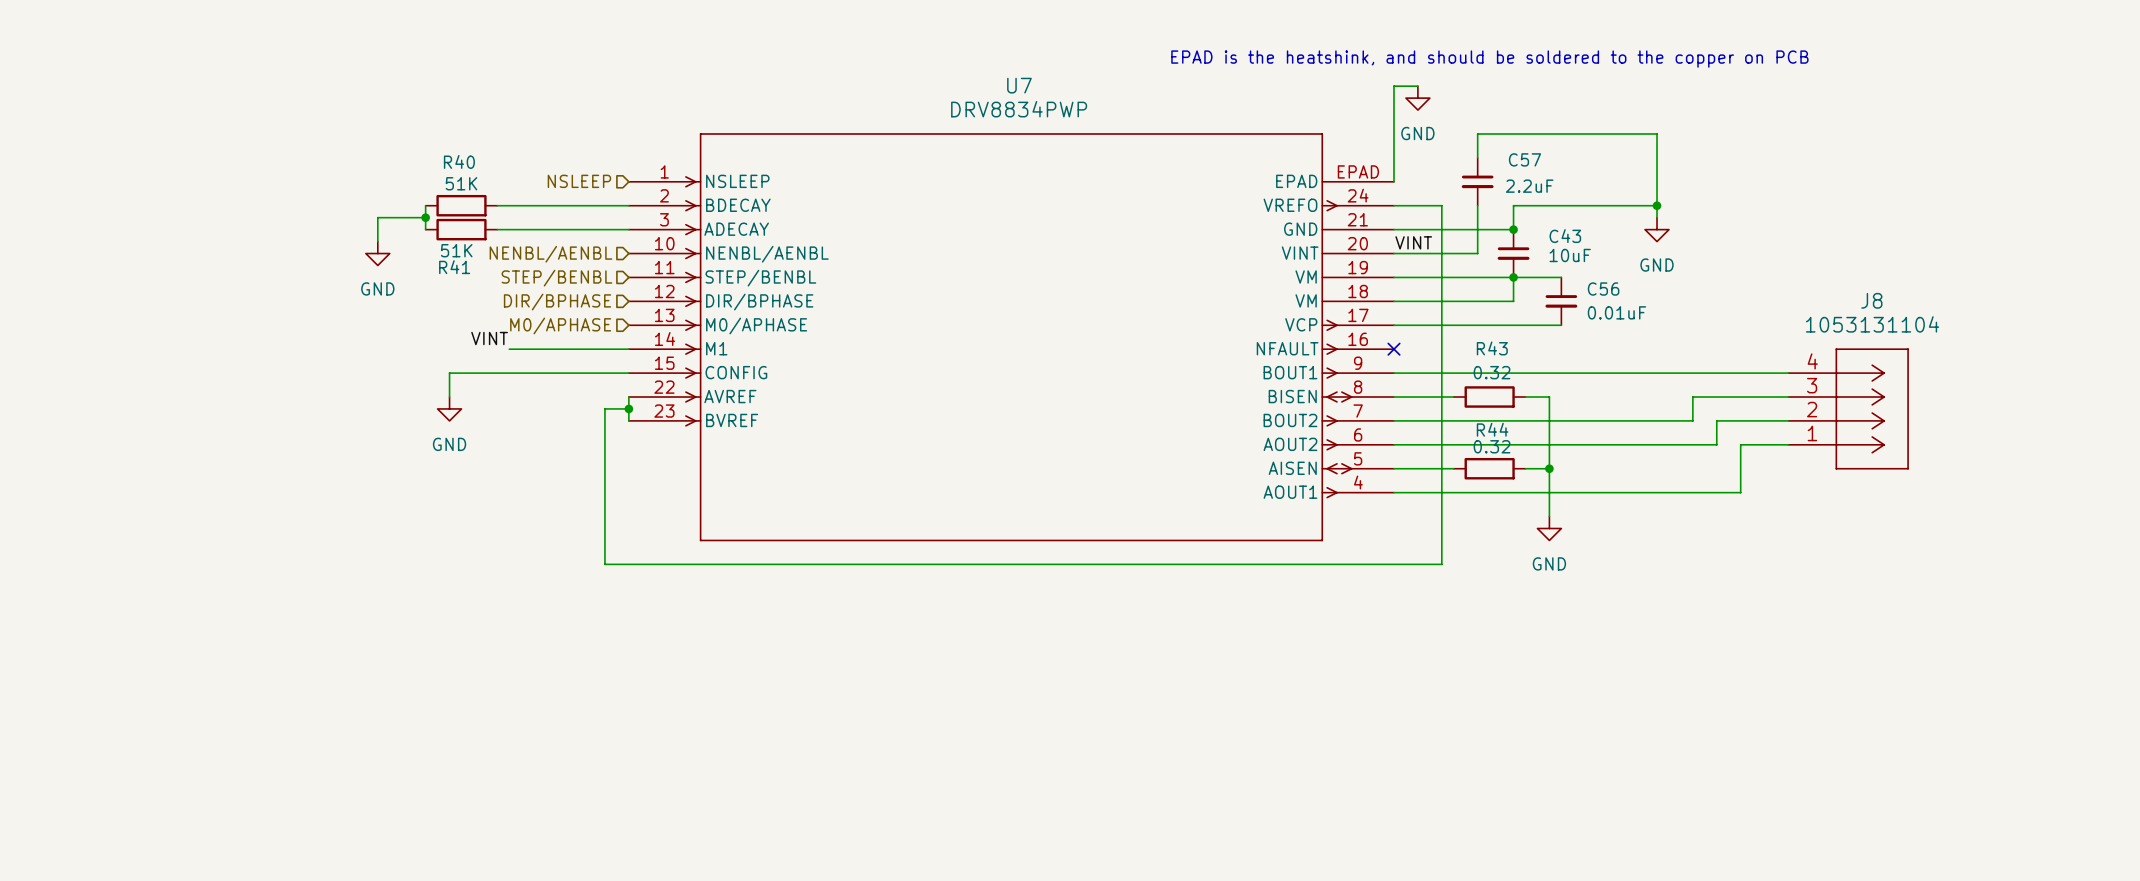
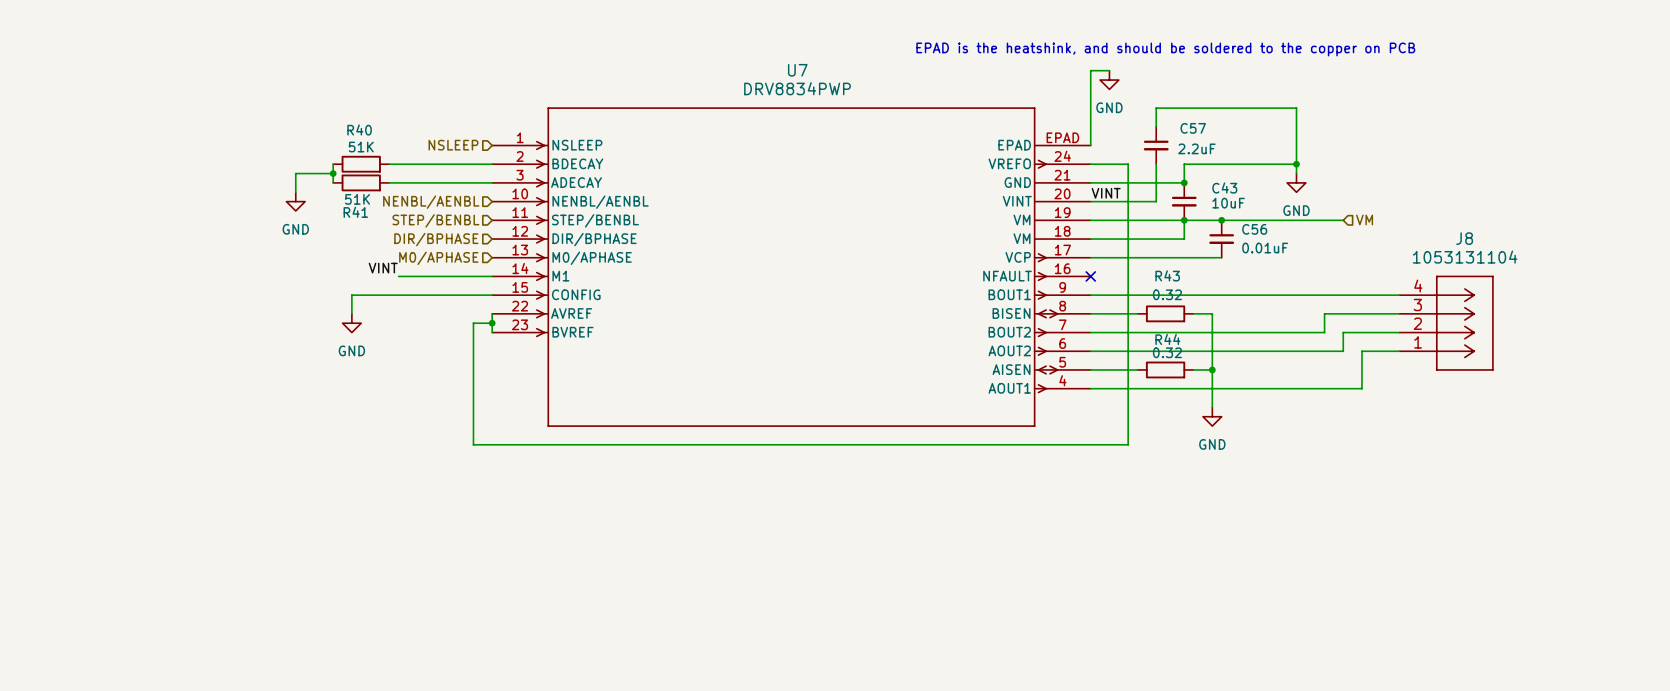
wire: none -> (1221, 220) (1343, 220)
junction: none -> (1221, 220)
hierarchical label: none -> VM (1364, 219)

